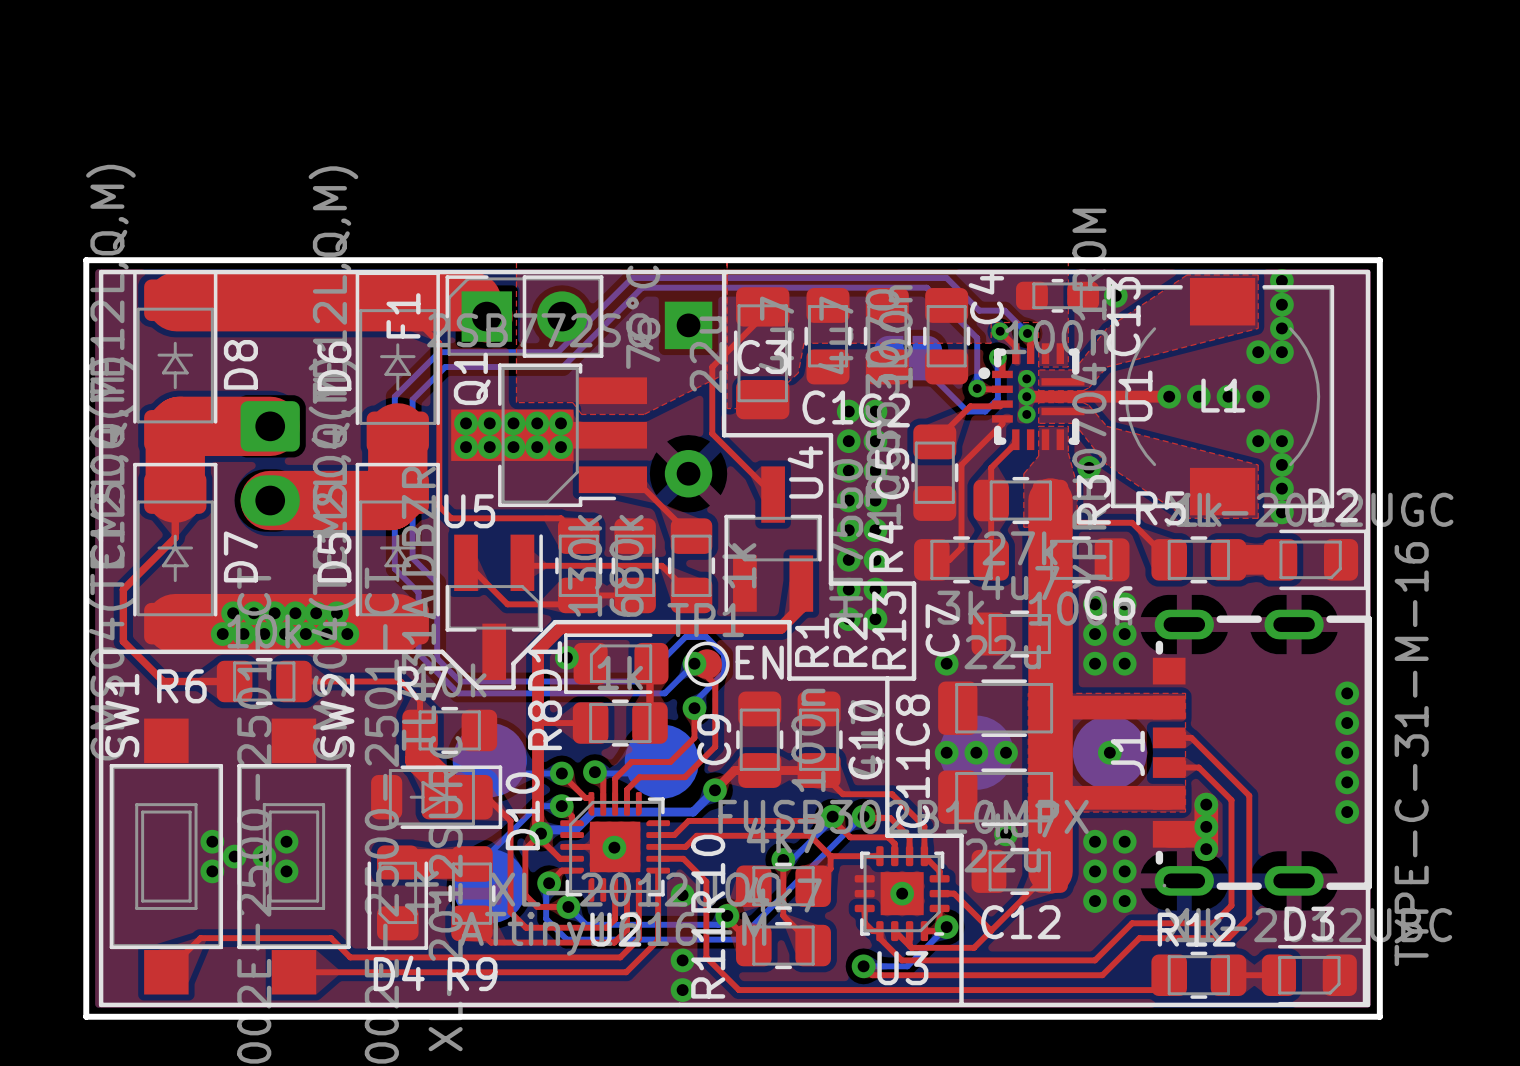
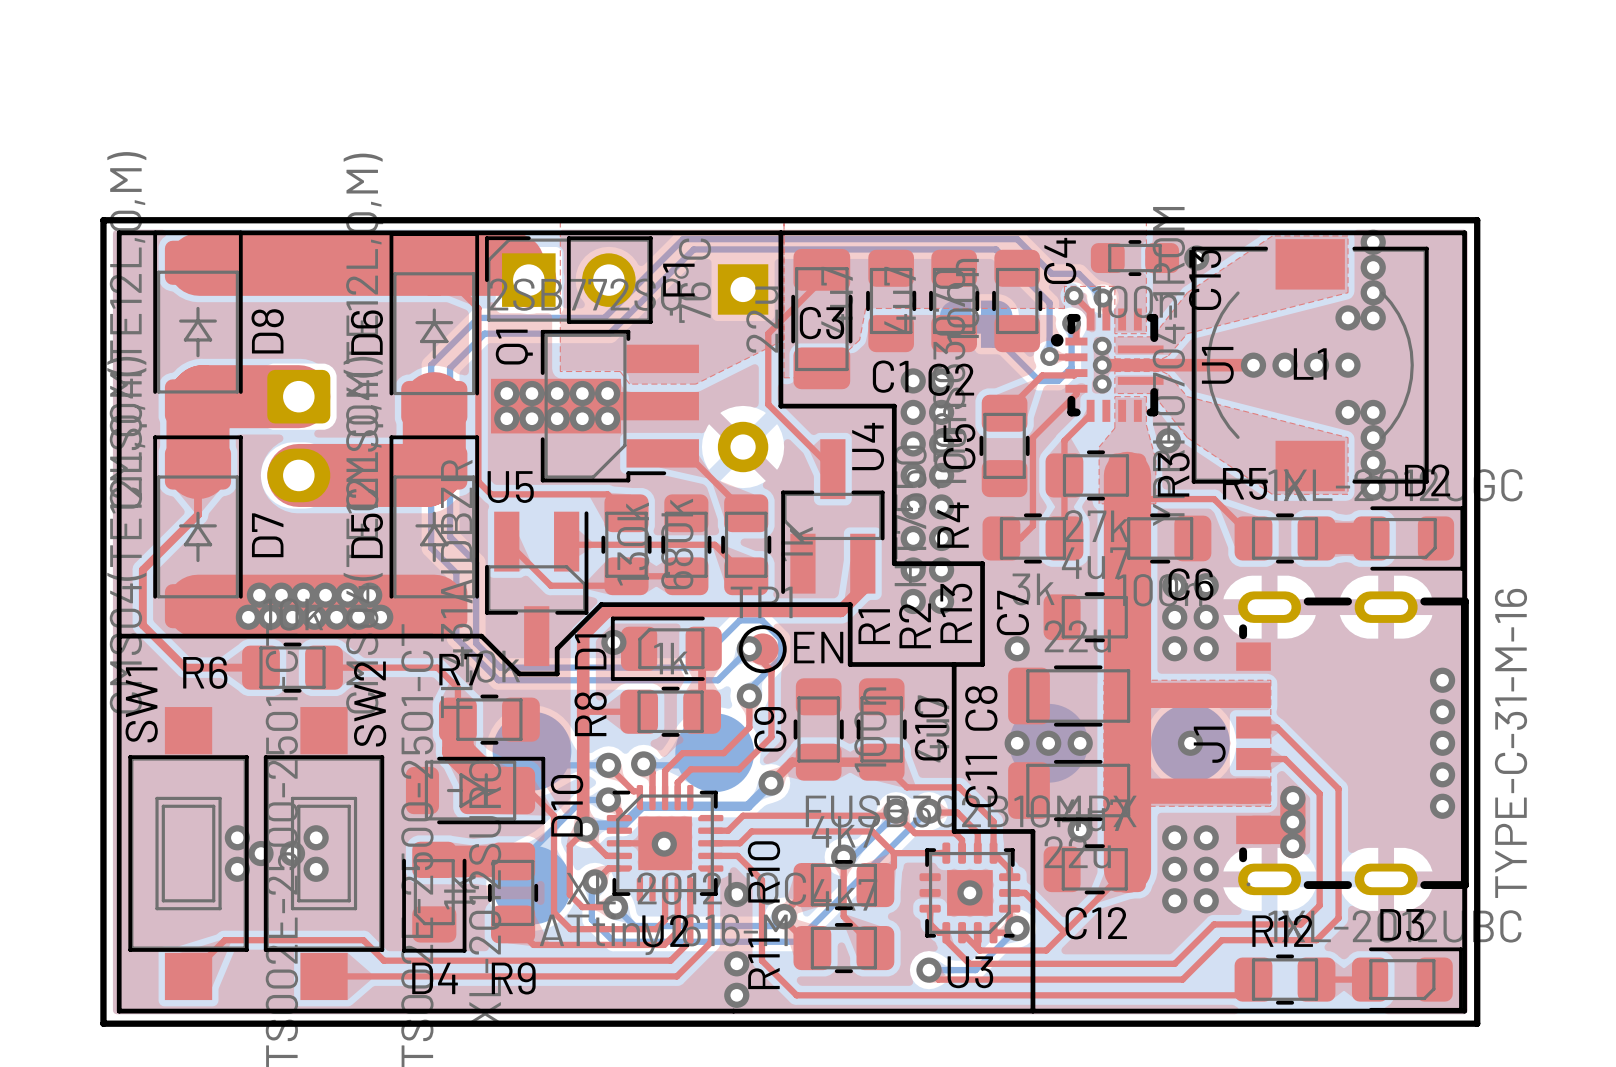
F1 name position: F1 (403, 315) -> F1 (678, 280)

